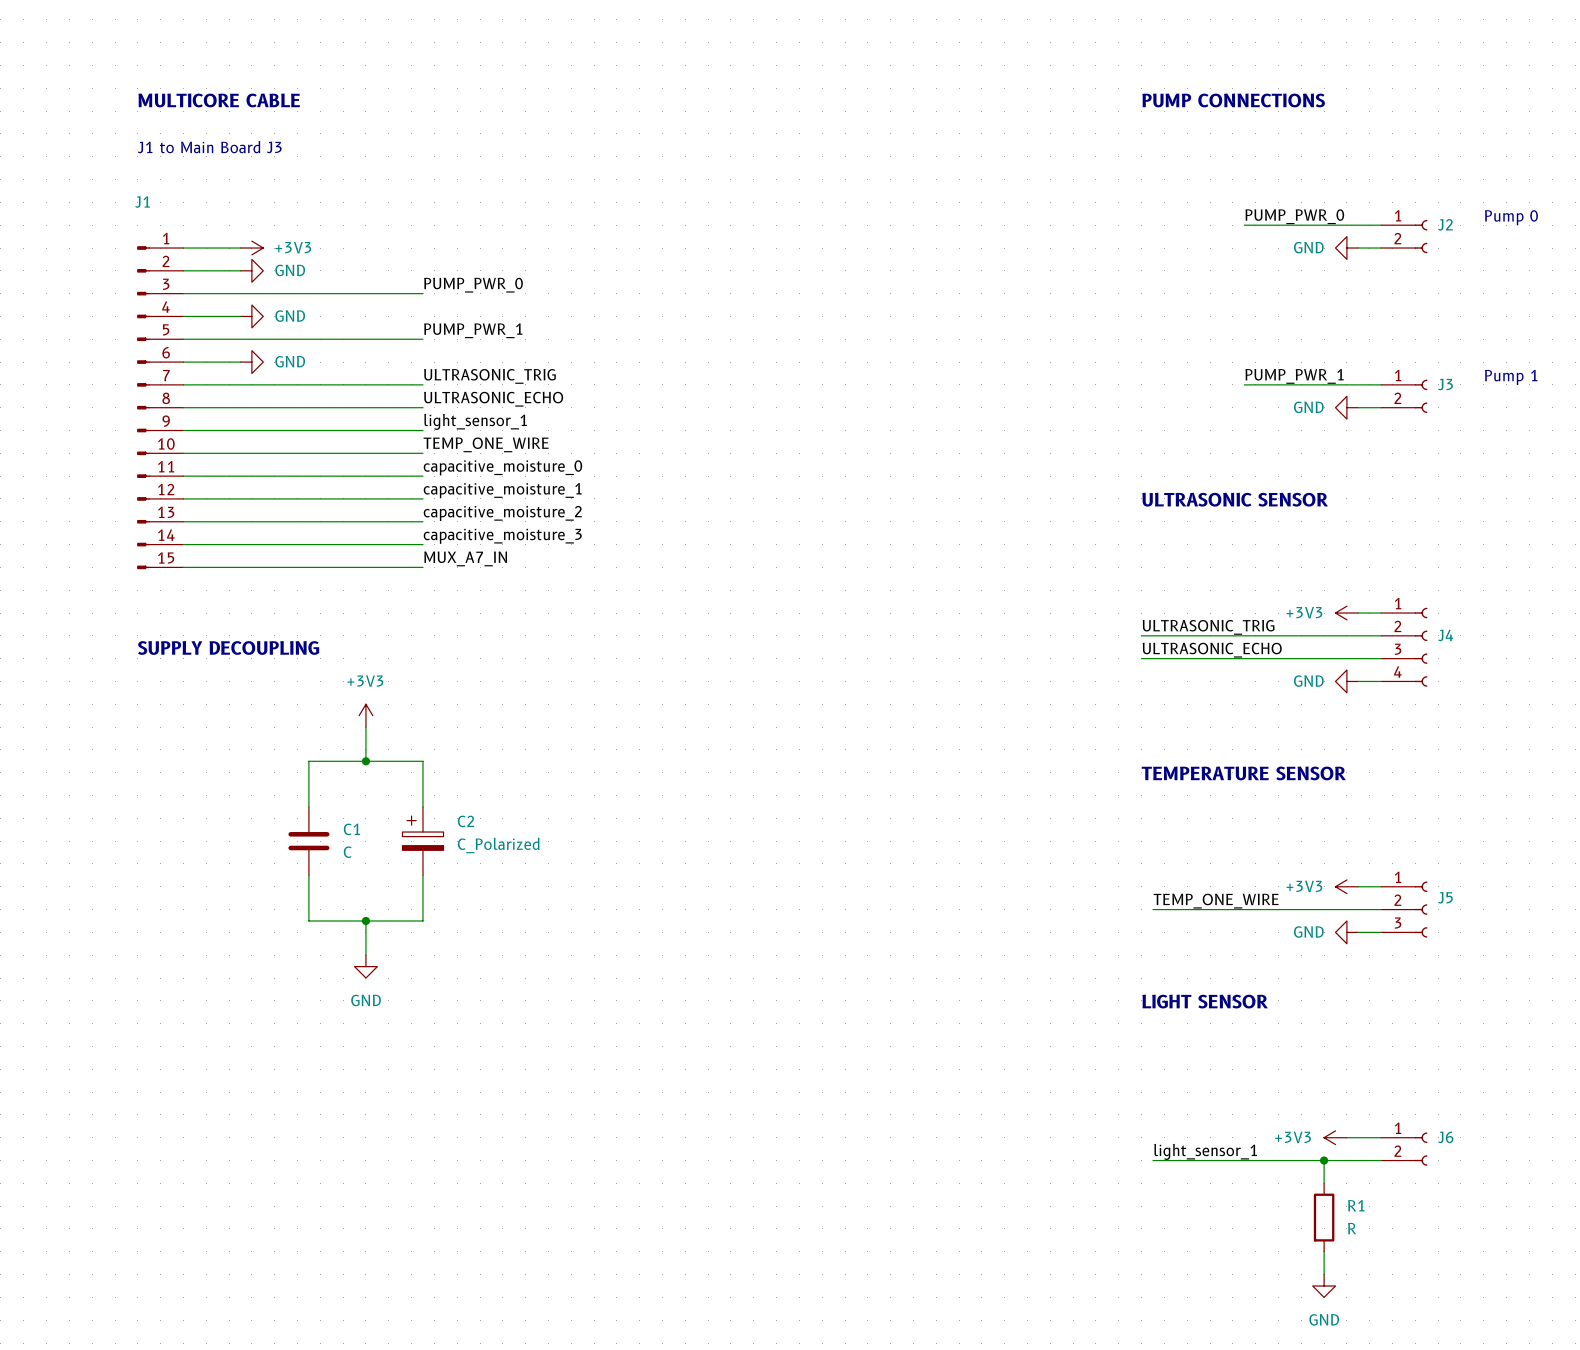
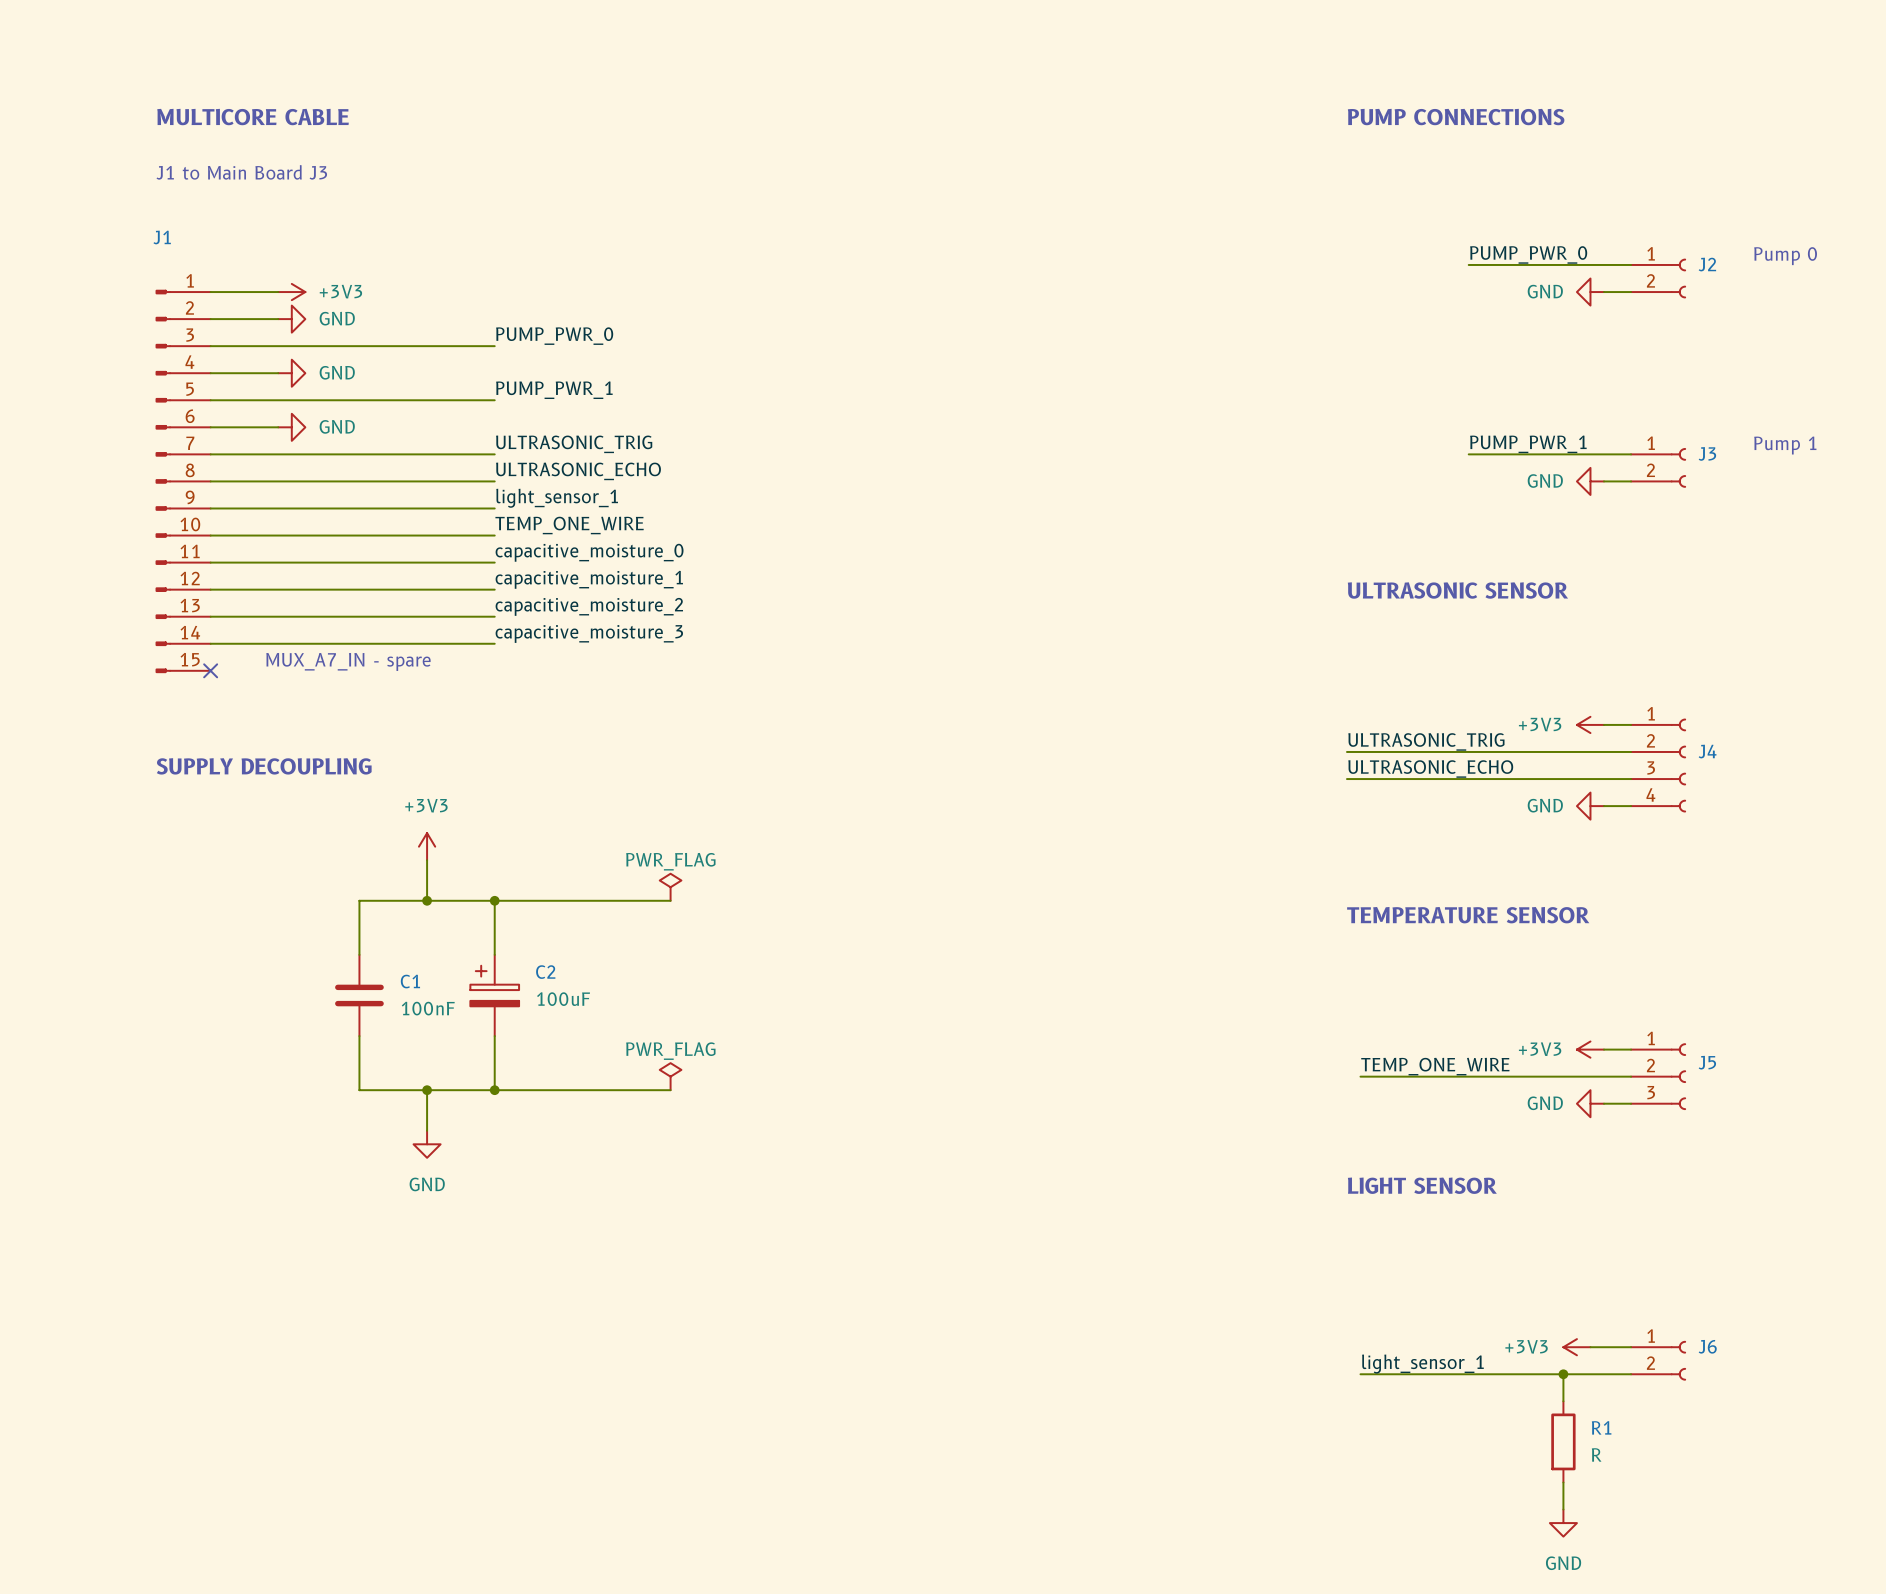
label: MUX_A7_IN (465, 558) -> none
text: none -> MUX_A7_IN - spare (348, 661)
wire: (183, 567) (422, 567) -> none
no-connect mark: none -> (210, 670)
power symbol: none -> PWR_FLAG (670, 887)
wire: none -> (494, 900) (670, 900)
junction: none -> (494, 900)
C2 value: C_Polarized (498, 845) -> 100uF (563, 999)
C1 value: C (347, 852) -> 100nF (428, 1008)
power symbol: none -> PWR_FLAG (670, 1076)
wire: none -> (494, 1090) (670, 1090)
junction: none -> (494, 1090)

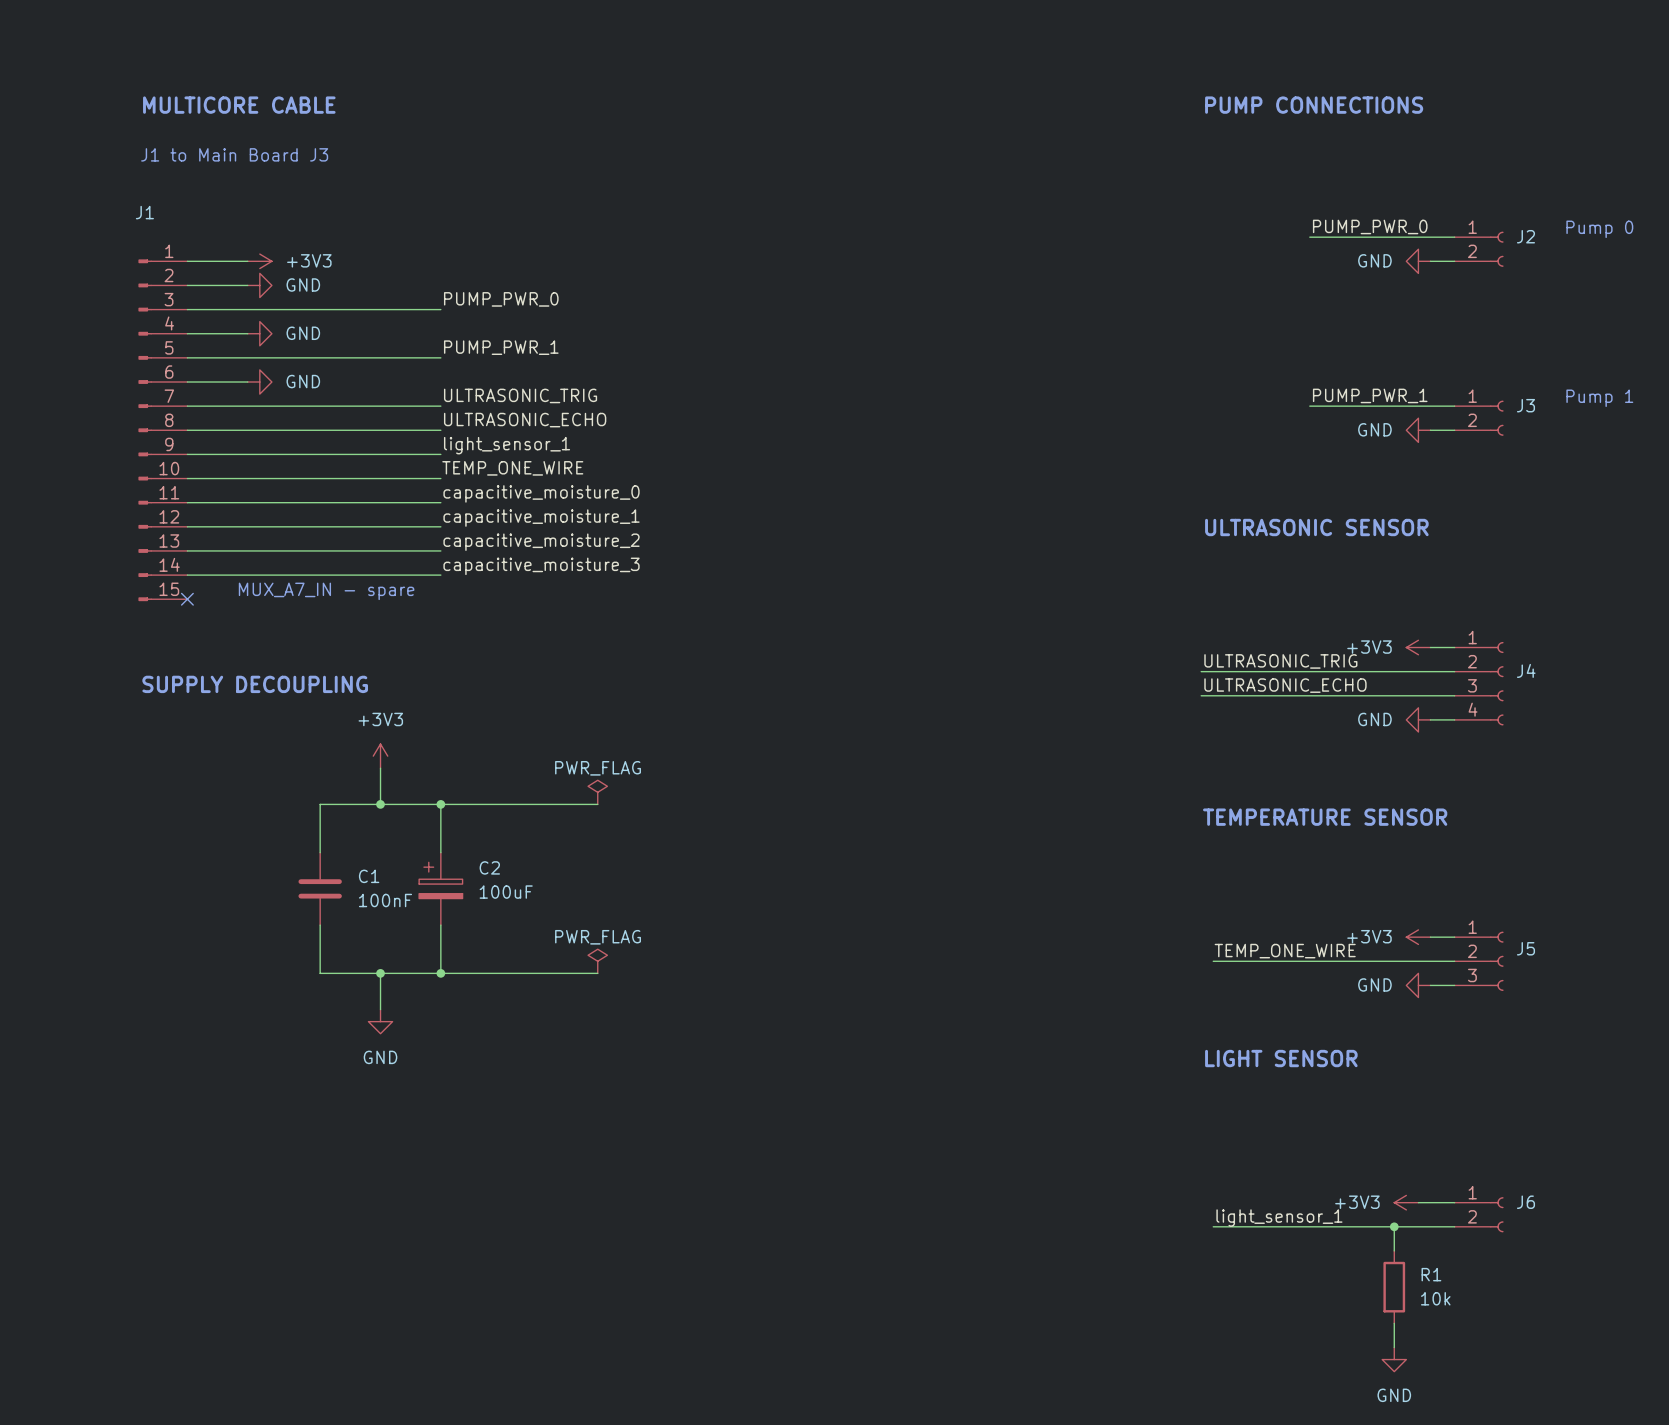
R1 value: R (1596, 1454) -> 10k (1435, 1298)

